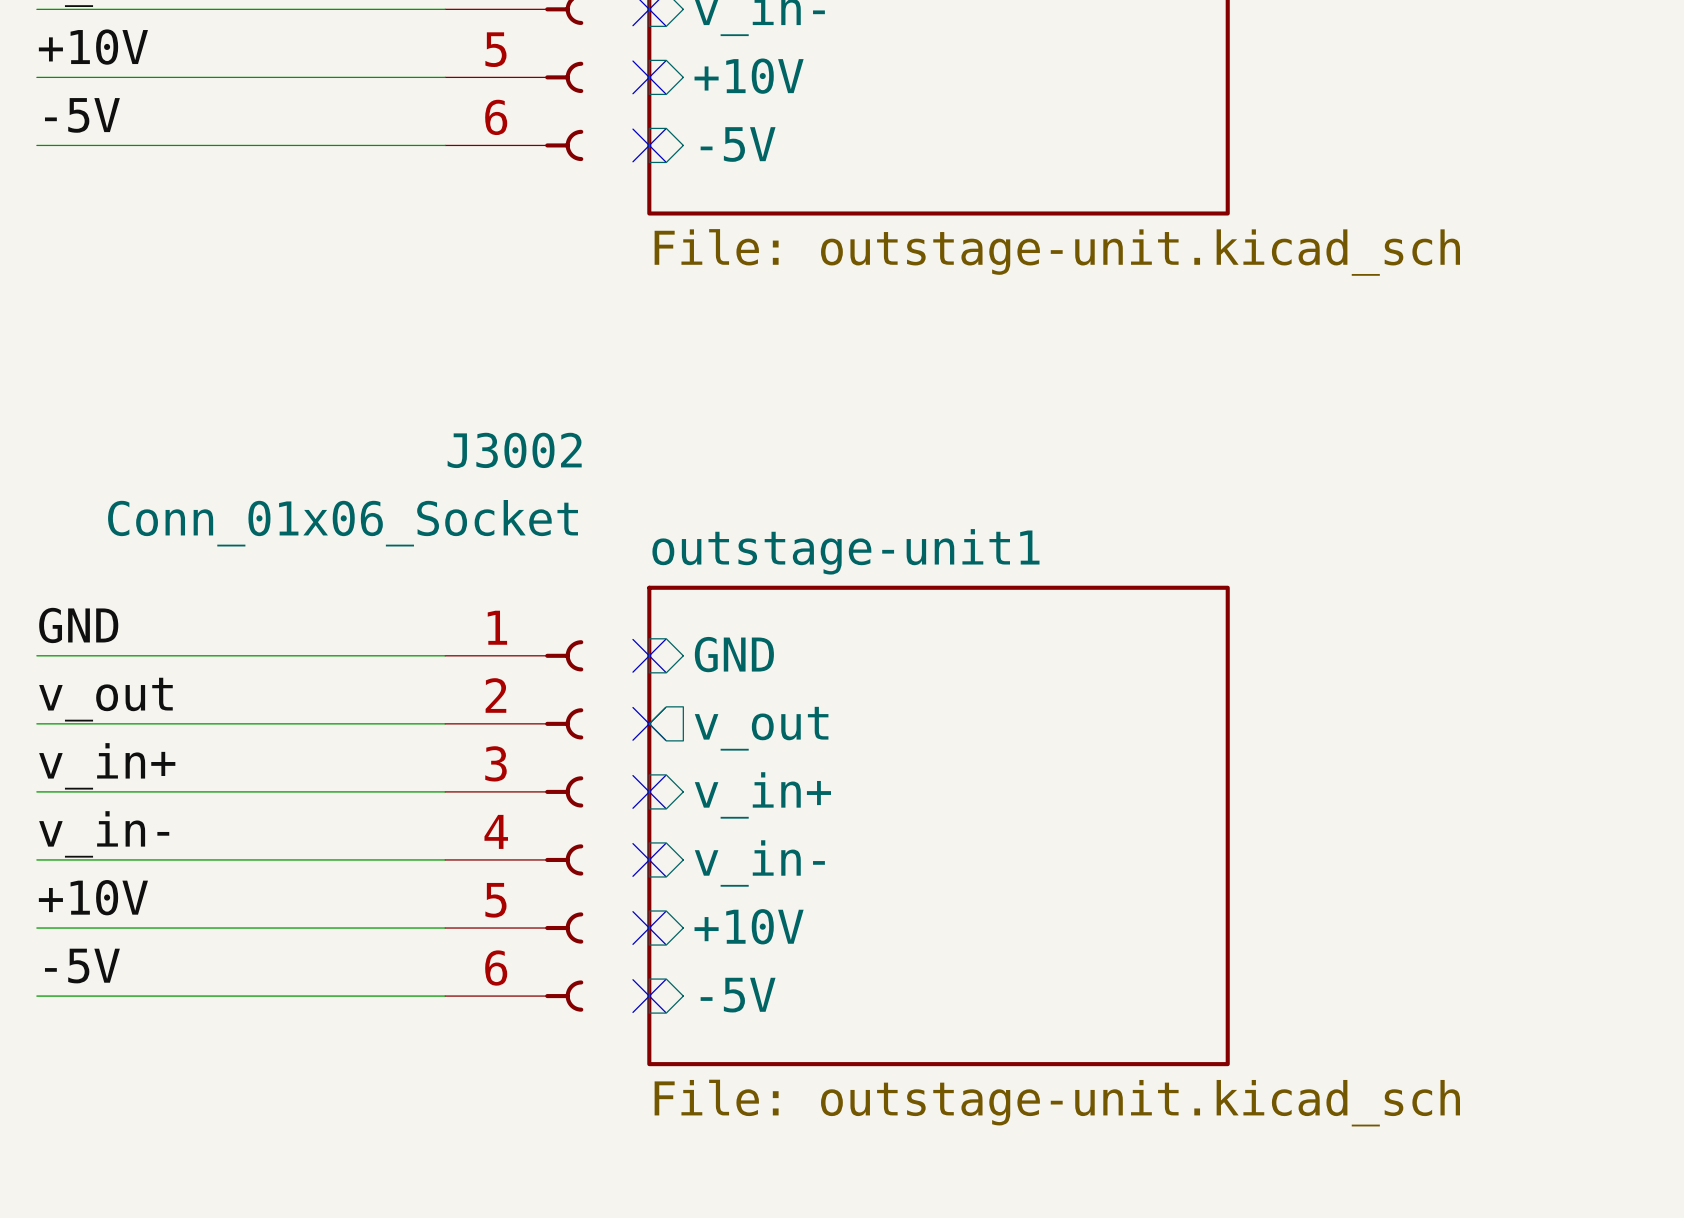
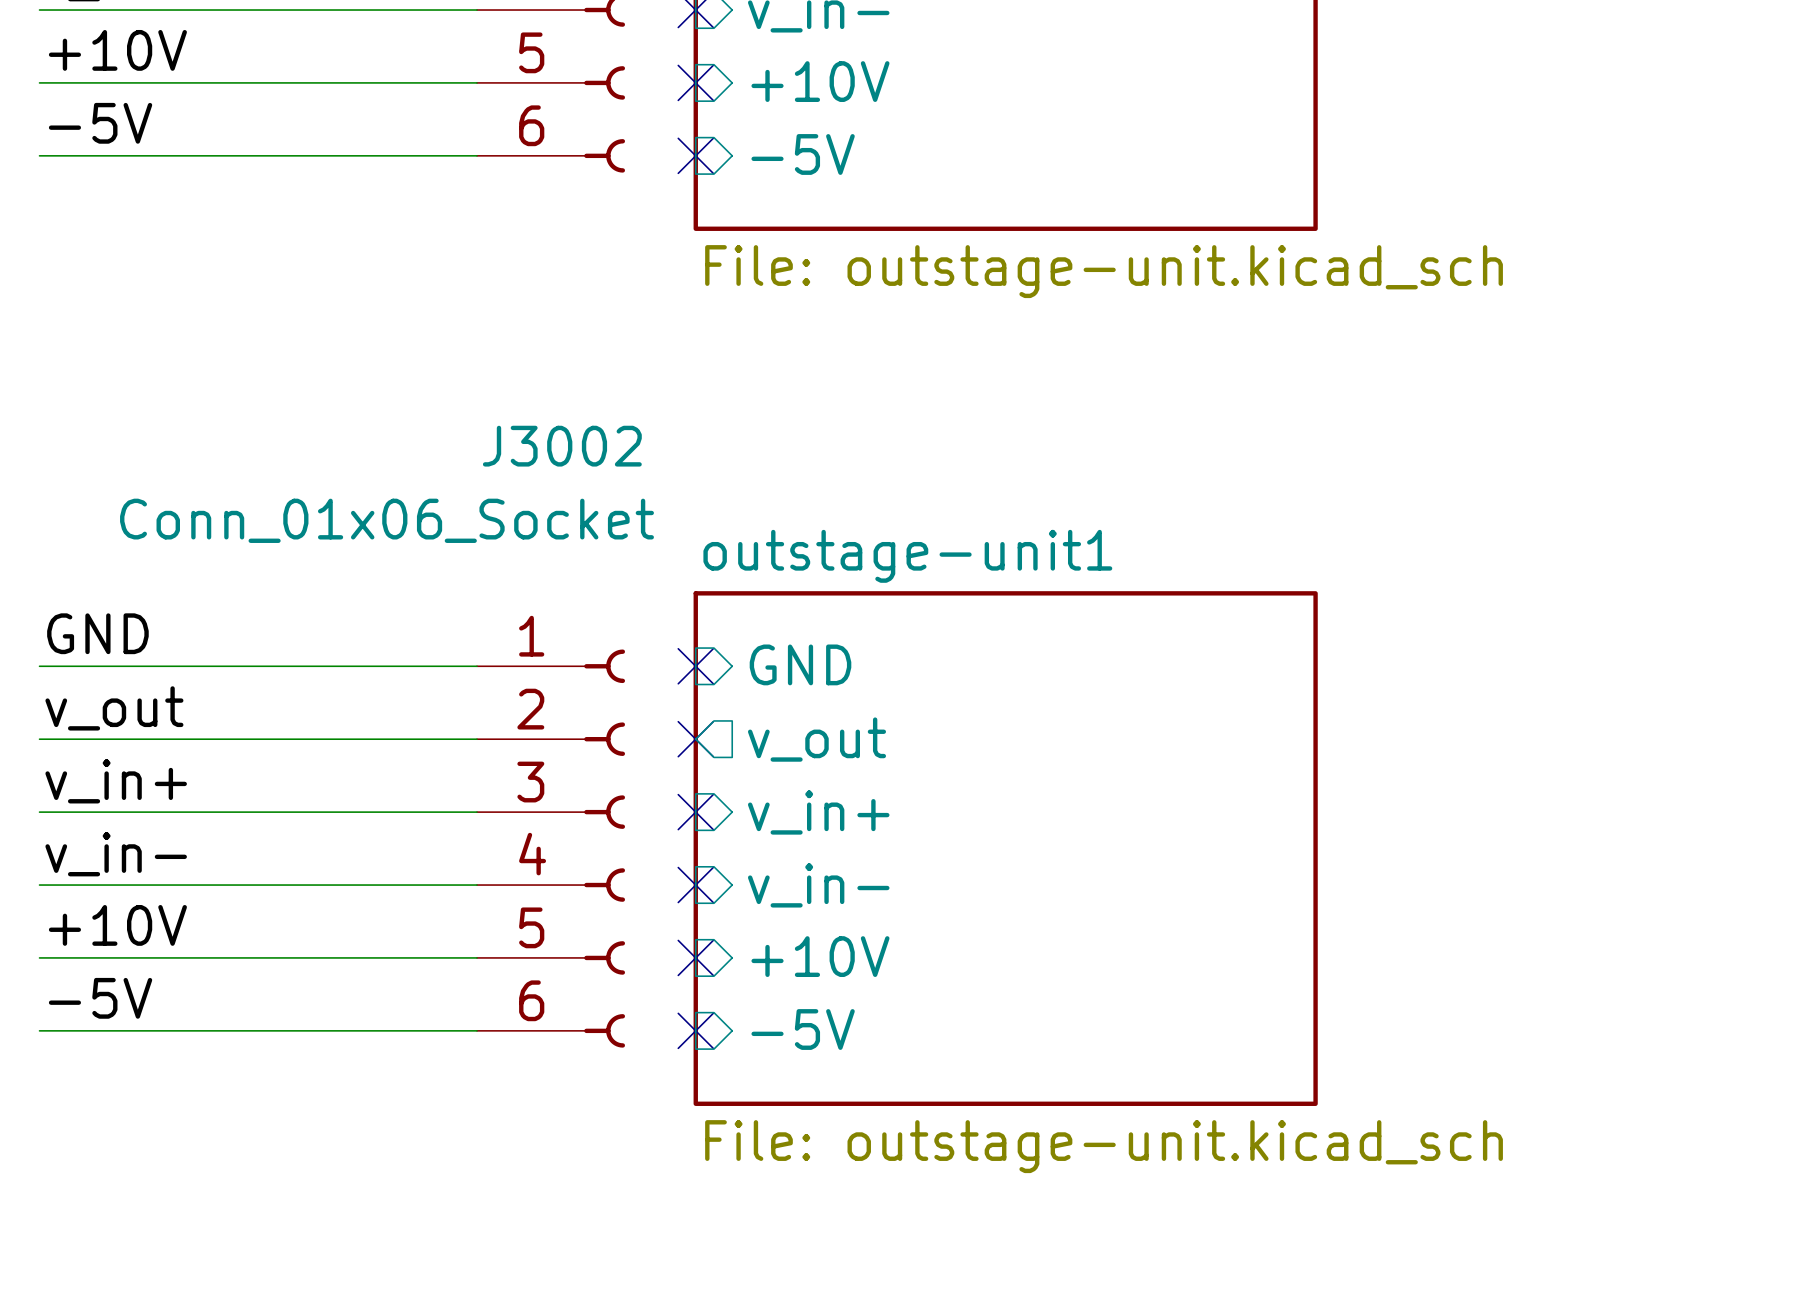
no-connect mark: none -> (695, 666)
label position: GND (78, 625) -> GND (97, 633)
sheet pin position: GND (734, 654) -> GND (800, 664)
wire: (36, 655) (445, 655) -> (39, 666) (477, 666)
no-connect mark: (649, 655) -> none
no-connect mark: none -> (695, 739)
label position: v_out (105, 699) -> v_out (114, 708)
wire: (36, 723) (445, 723) -> (39, 739) (477, 739)
no-connect mark: (649, 723) -> none
sheet pin position: v_out (761, 728) -> v_out (816, 739)
no-connect mark: none -> (695, 812)
label position: v_in+ (107, 766) -> v_in+ (116, 781)
wire: (36, 791) (445, 791) -> (39, 812) (477, 812)
no-connect mark: (649, 791) -> none
sheet pin position: v_in+ (762, 795) -> v_in+ (818, 812)
J3002 position: (514, 825) -> (551, 848)
no-connect mark: none -> (695, 885)
sheet outstage-unit1 position: (938, 825) -> (1005, 848)
label position: v_in- (104, 834) -> v_in- (116, 854)
wire: (36, 859) (445, 859) -> (39, 885) (477, 885)
no-connect mark: (649, 859) -> none
sheet pin position: v_in- (759, 863) -> v_in- (818, 885)
no-connect mark: none -> (695, 957)
label position: +10V (93, 897) -> +10V (117, 925)
sheet pin position: +10V (749, 926) -> +10V (820, 956)
wire: (36, 928) (445, 928) -> (39, 957) (477, 957)
no-connect mark: (649, 928) -> none
no-connect mark: none -> (695, 1030)
label position: -5V (82, 966) -> -5V (100, 998)
sheet pin position: -5V (738, 995) -> -5V (803, 1029)
wire: (36, 996) (445, 996) -> (39, 1030) (477, 1030)
no-connect mark: (649, 996) -> none

